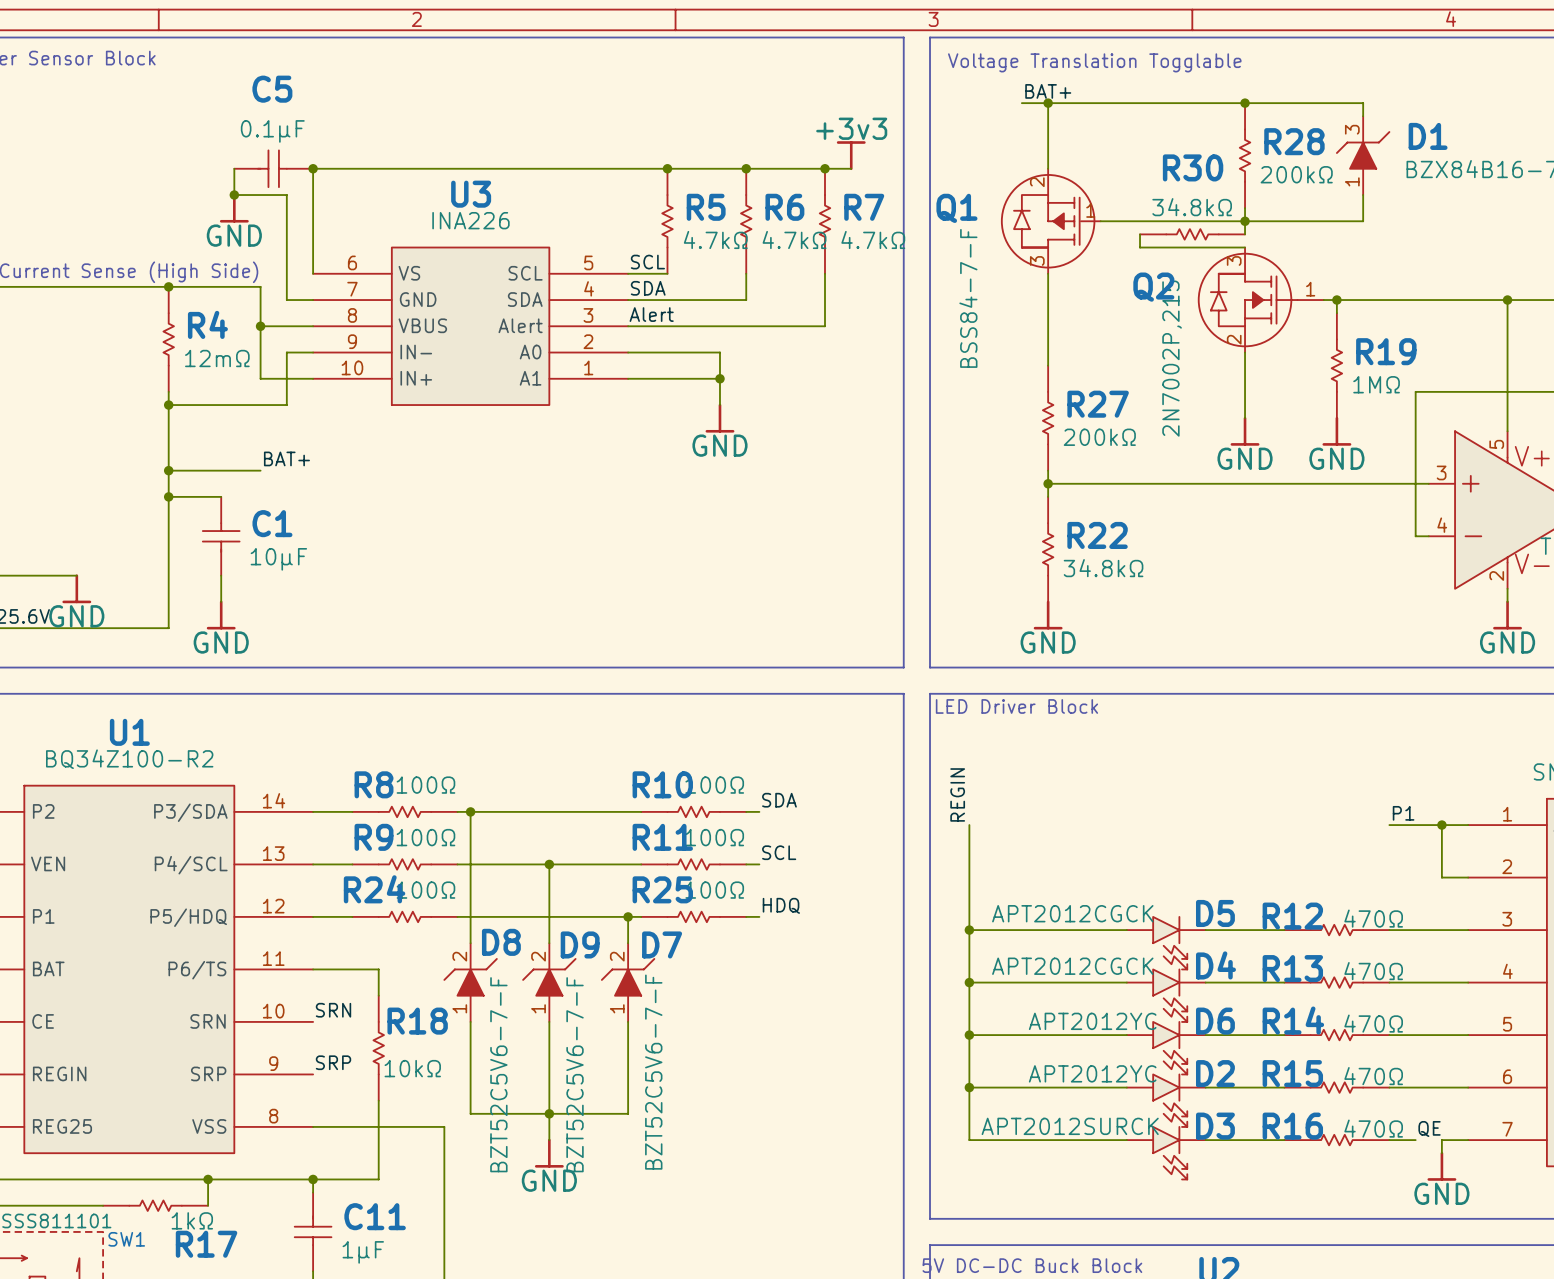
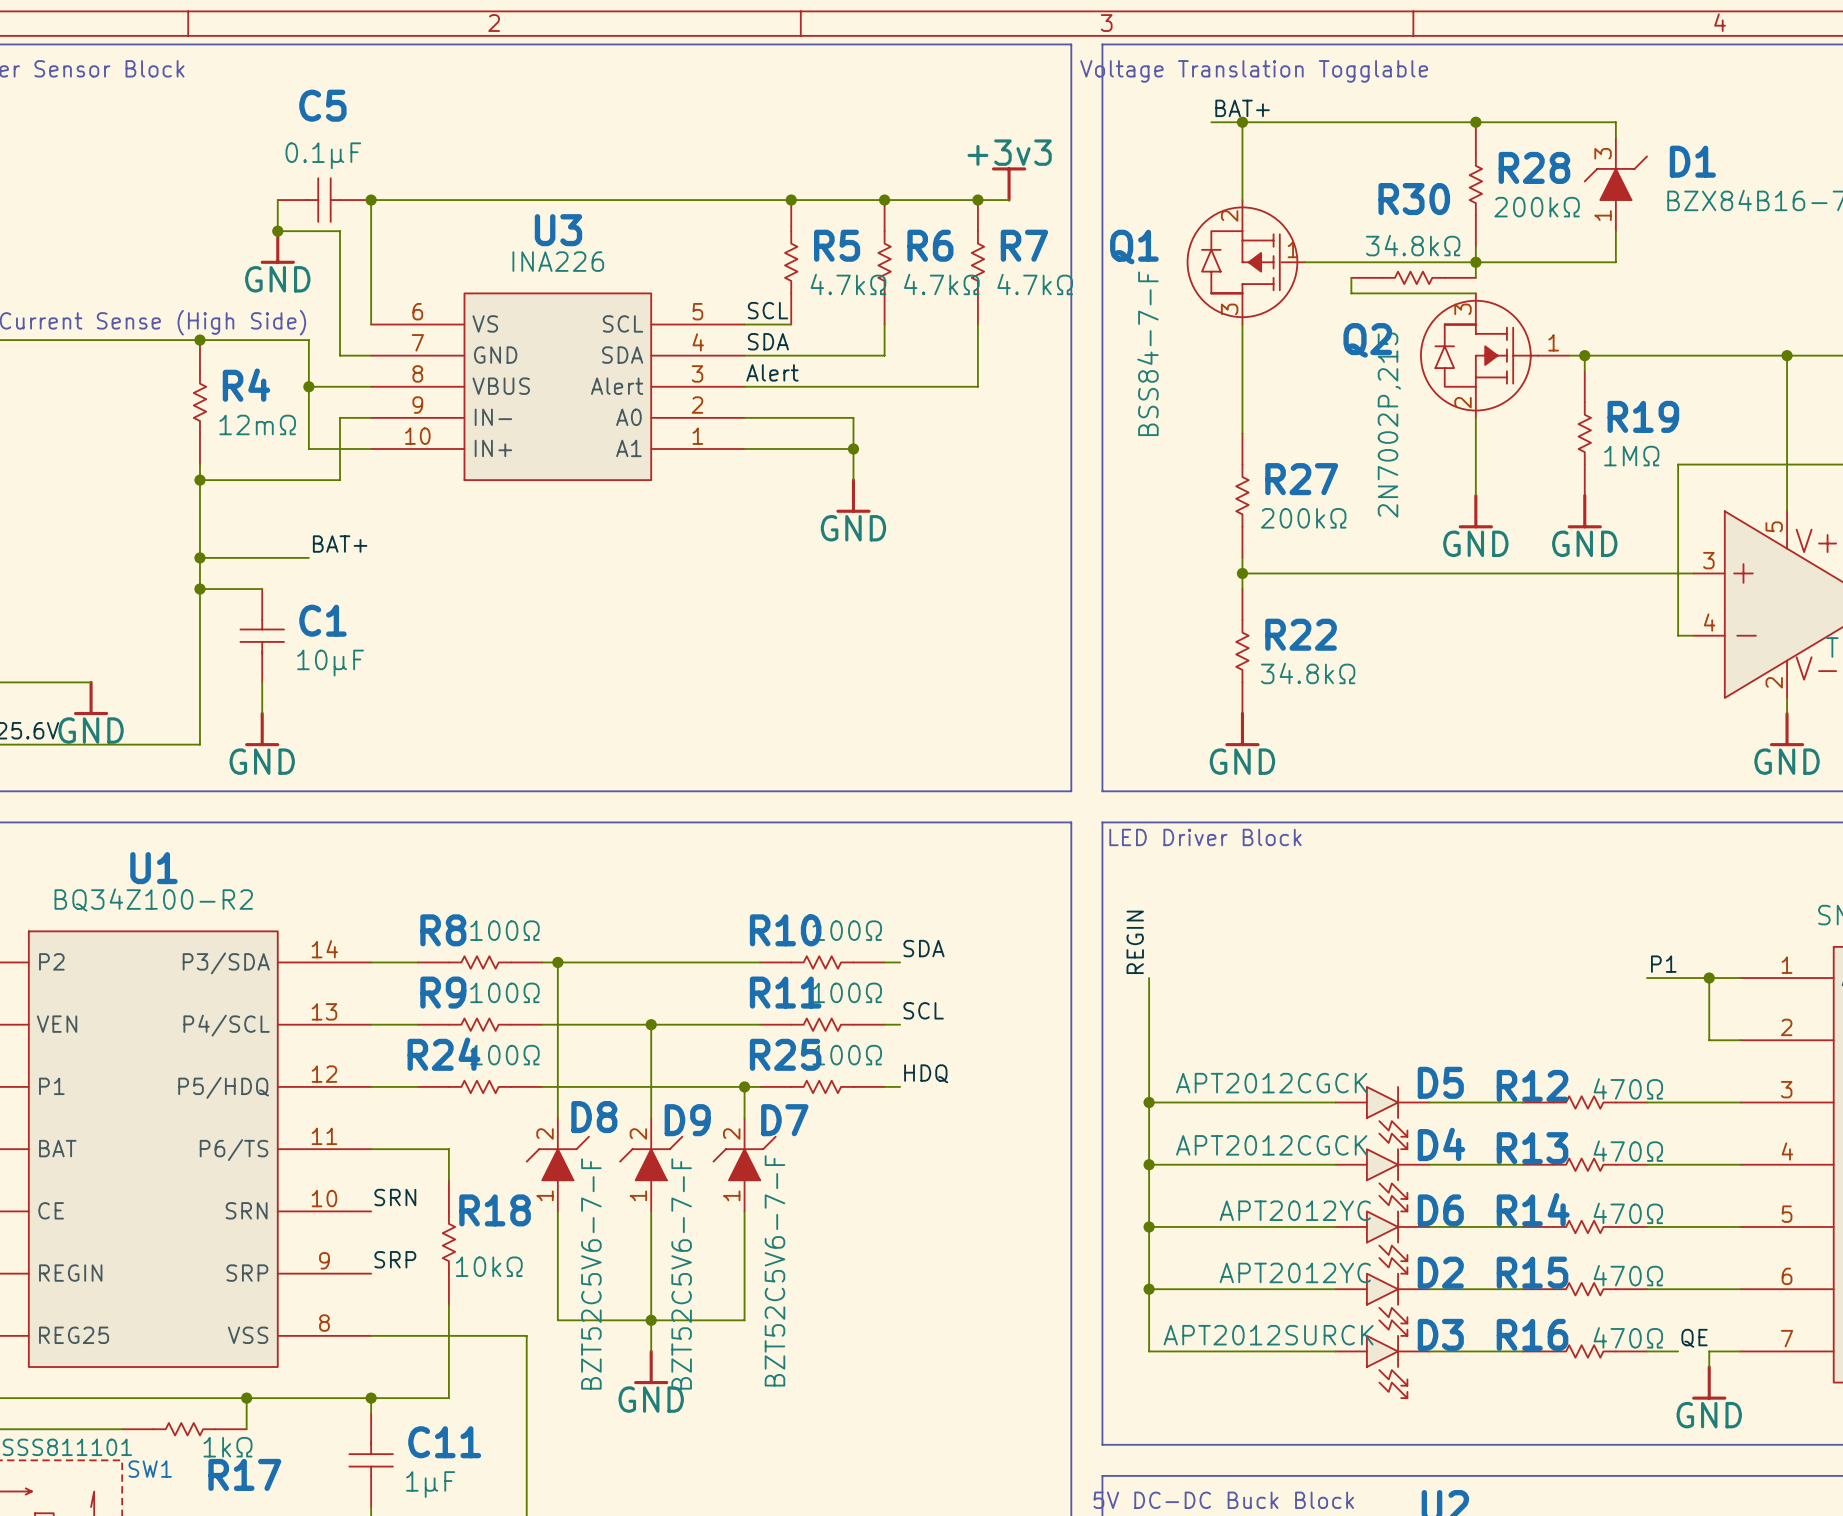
text position: Voltage Translation Togglable (1094, 62) -> Voltage Translation Togglable (1254, 71)

